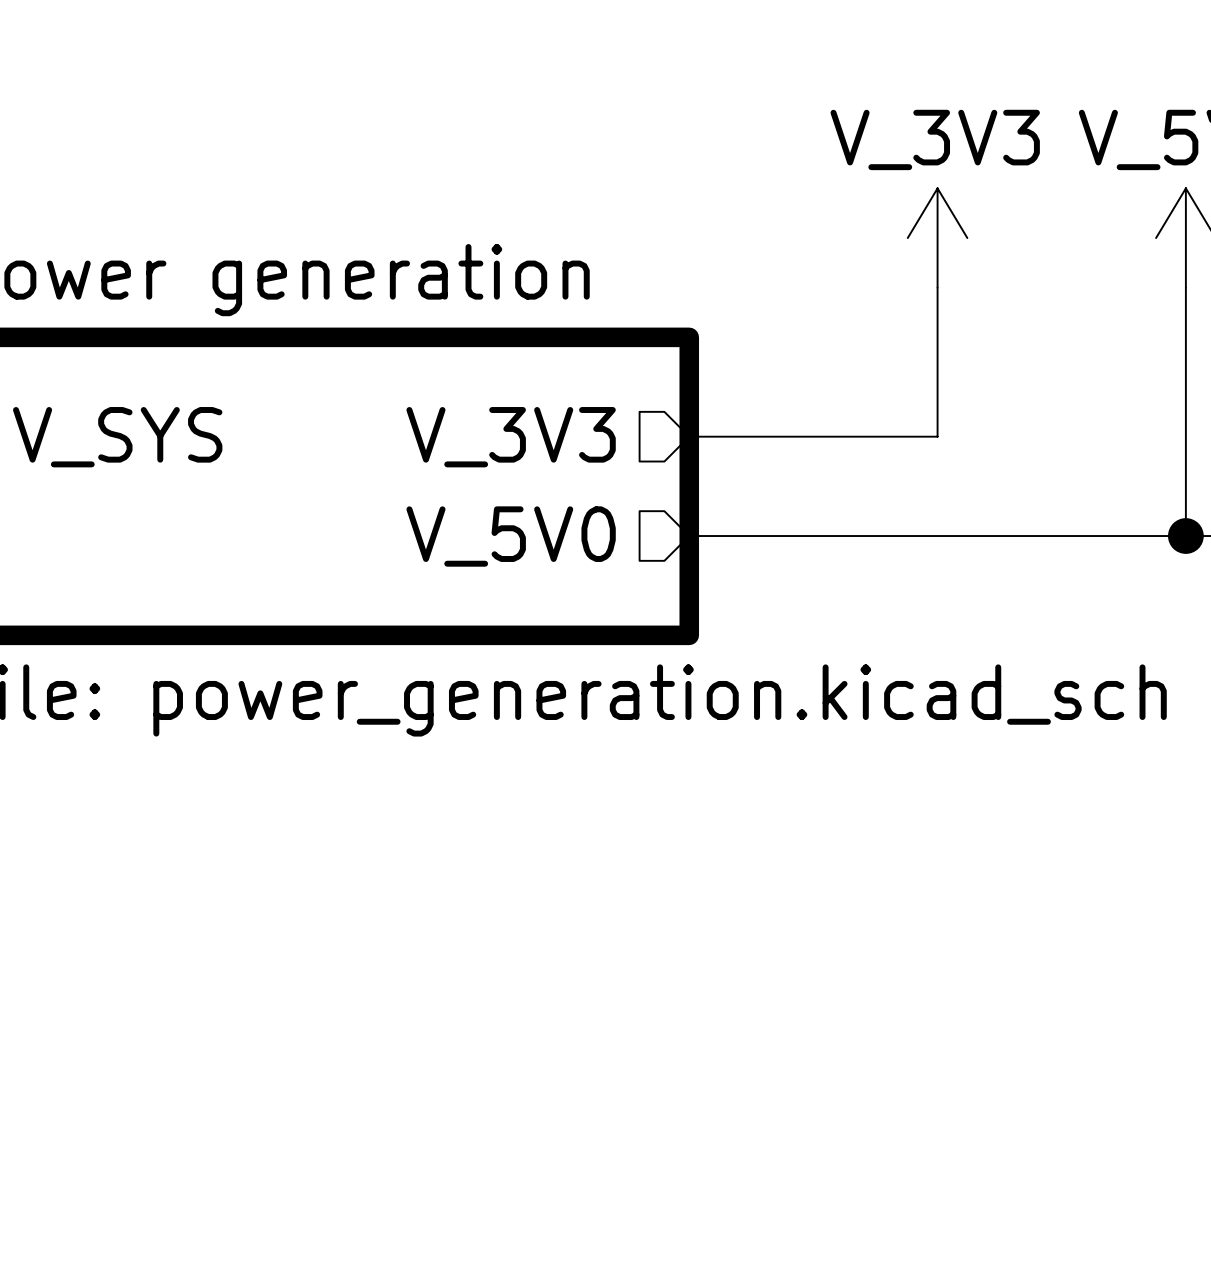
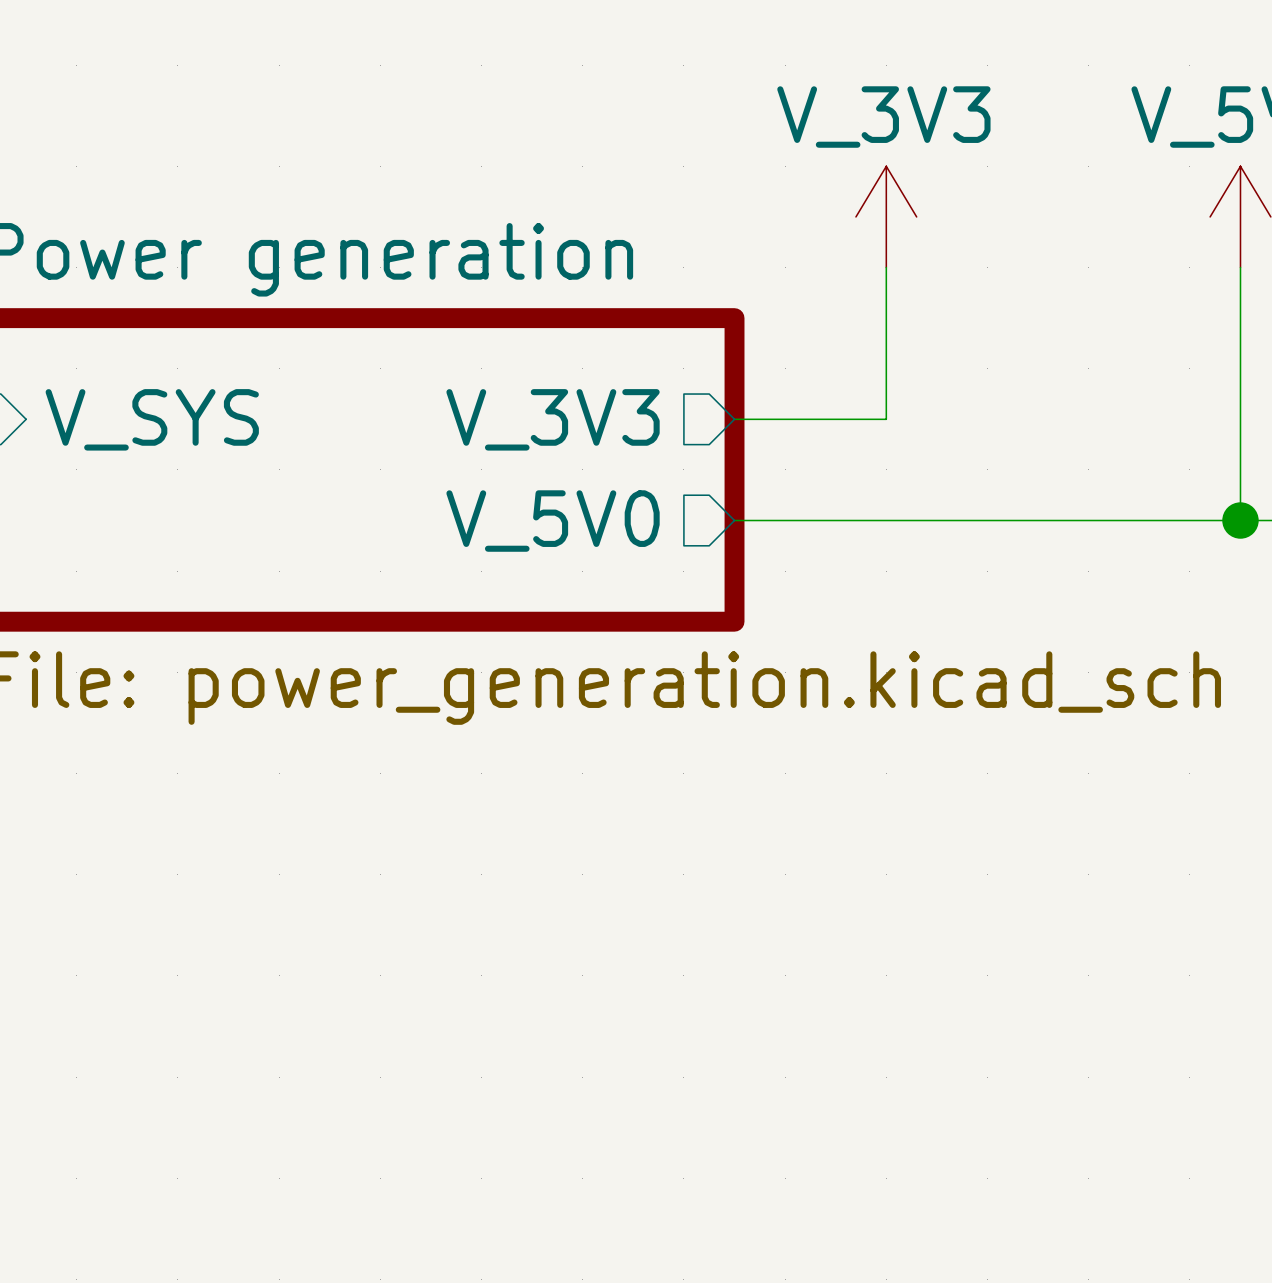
power symbol position: V_3V3 (937, 238) -> V_3V3 (886, 216)
wire: (937, 287) (937, 436) (838, 436) -> (886, 267) (886, 419)

